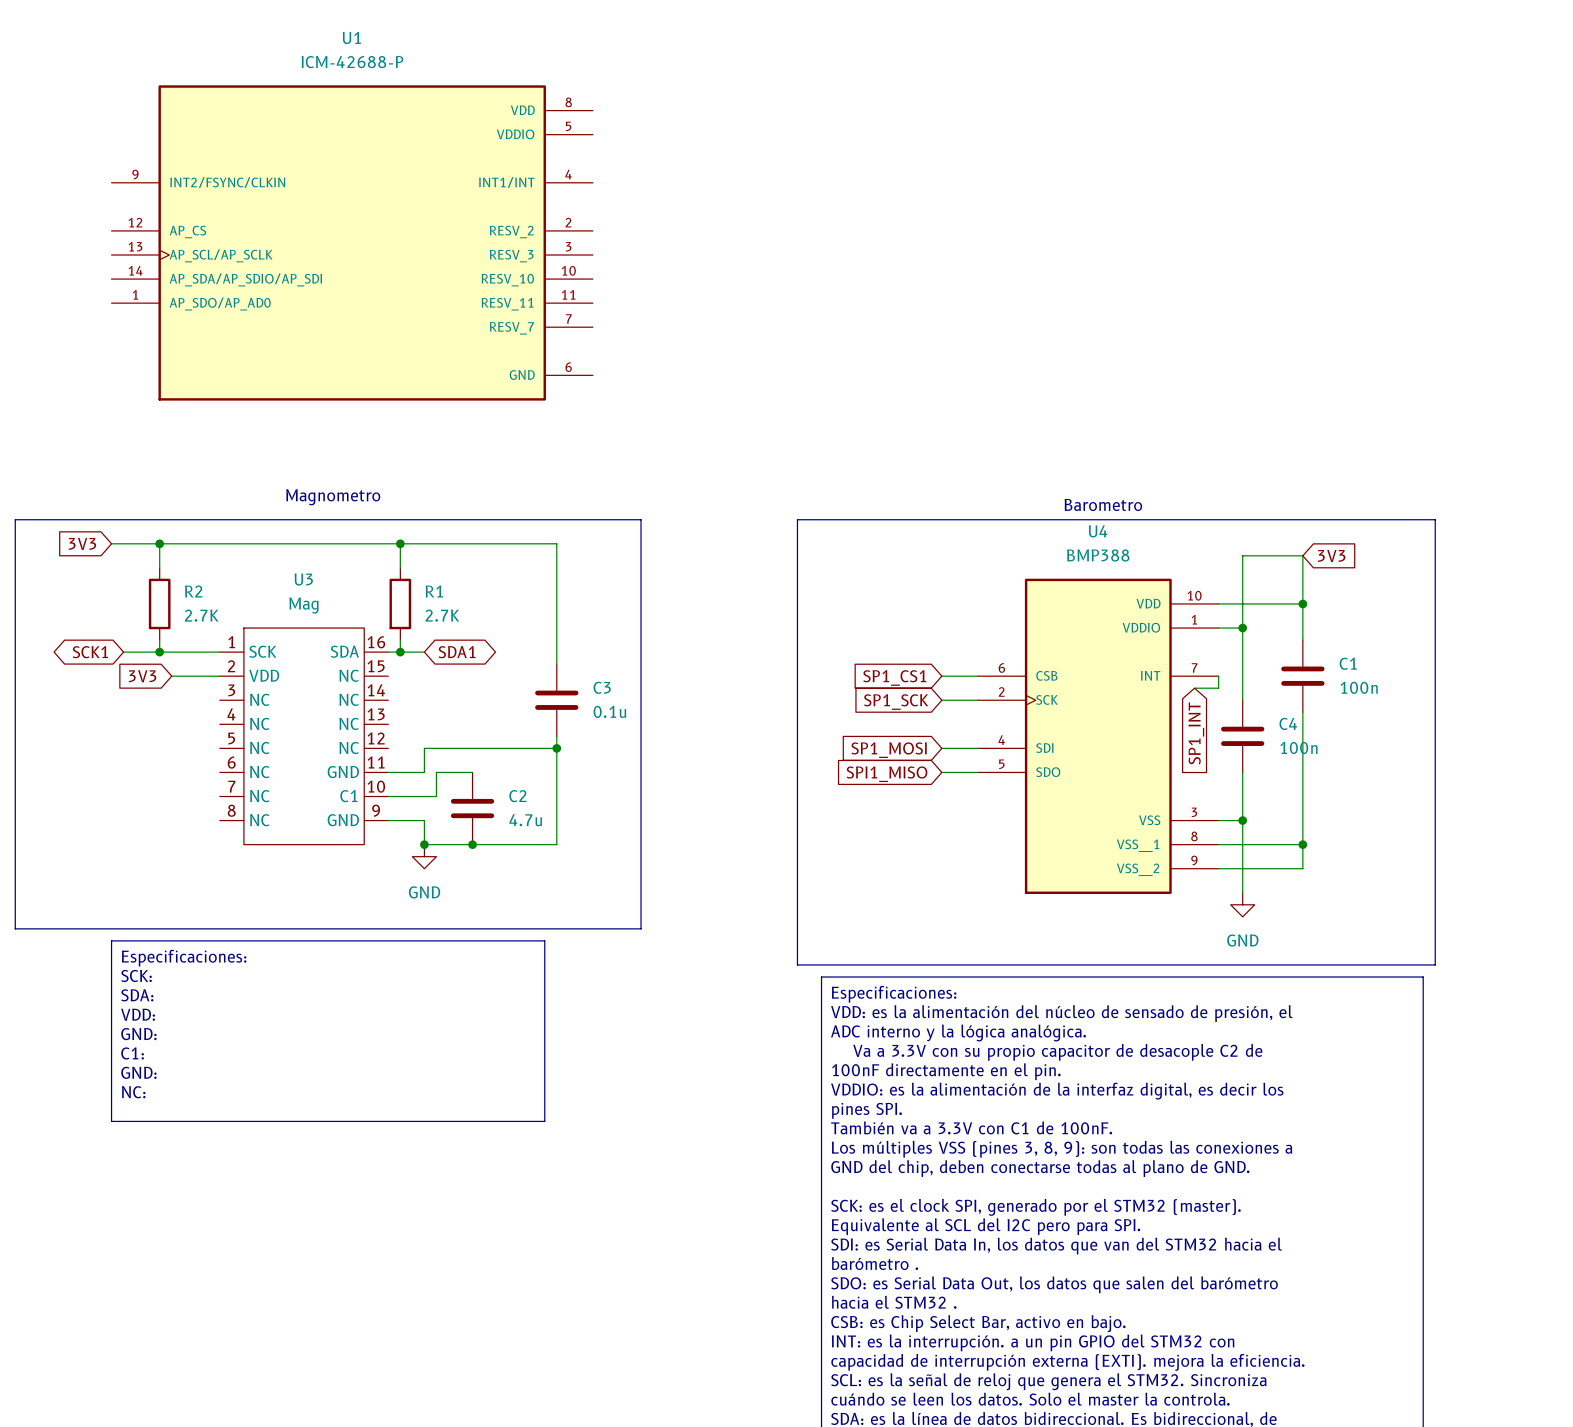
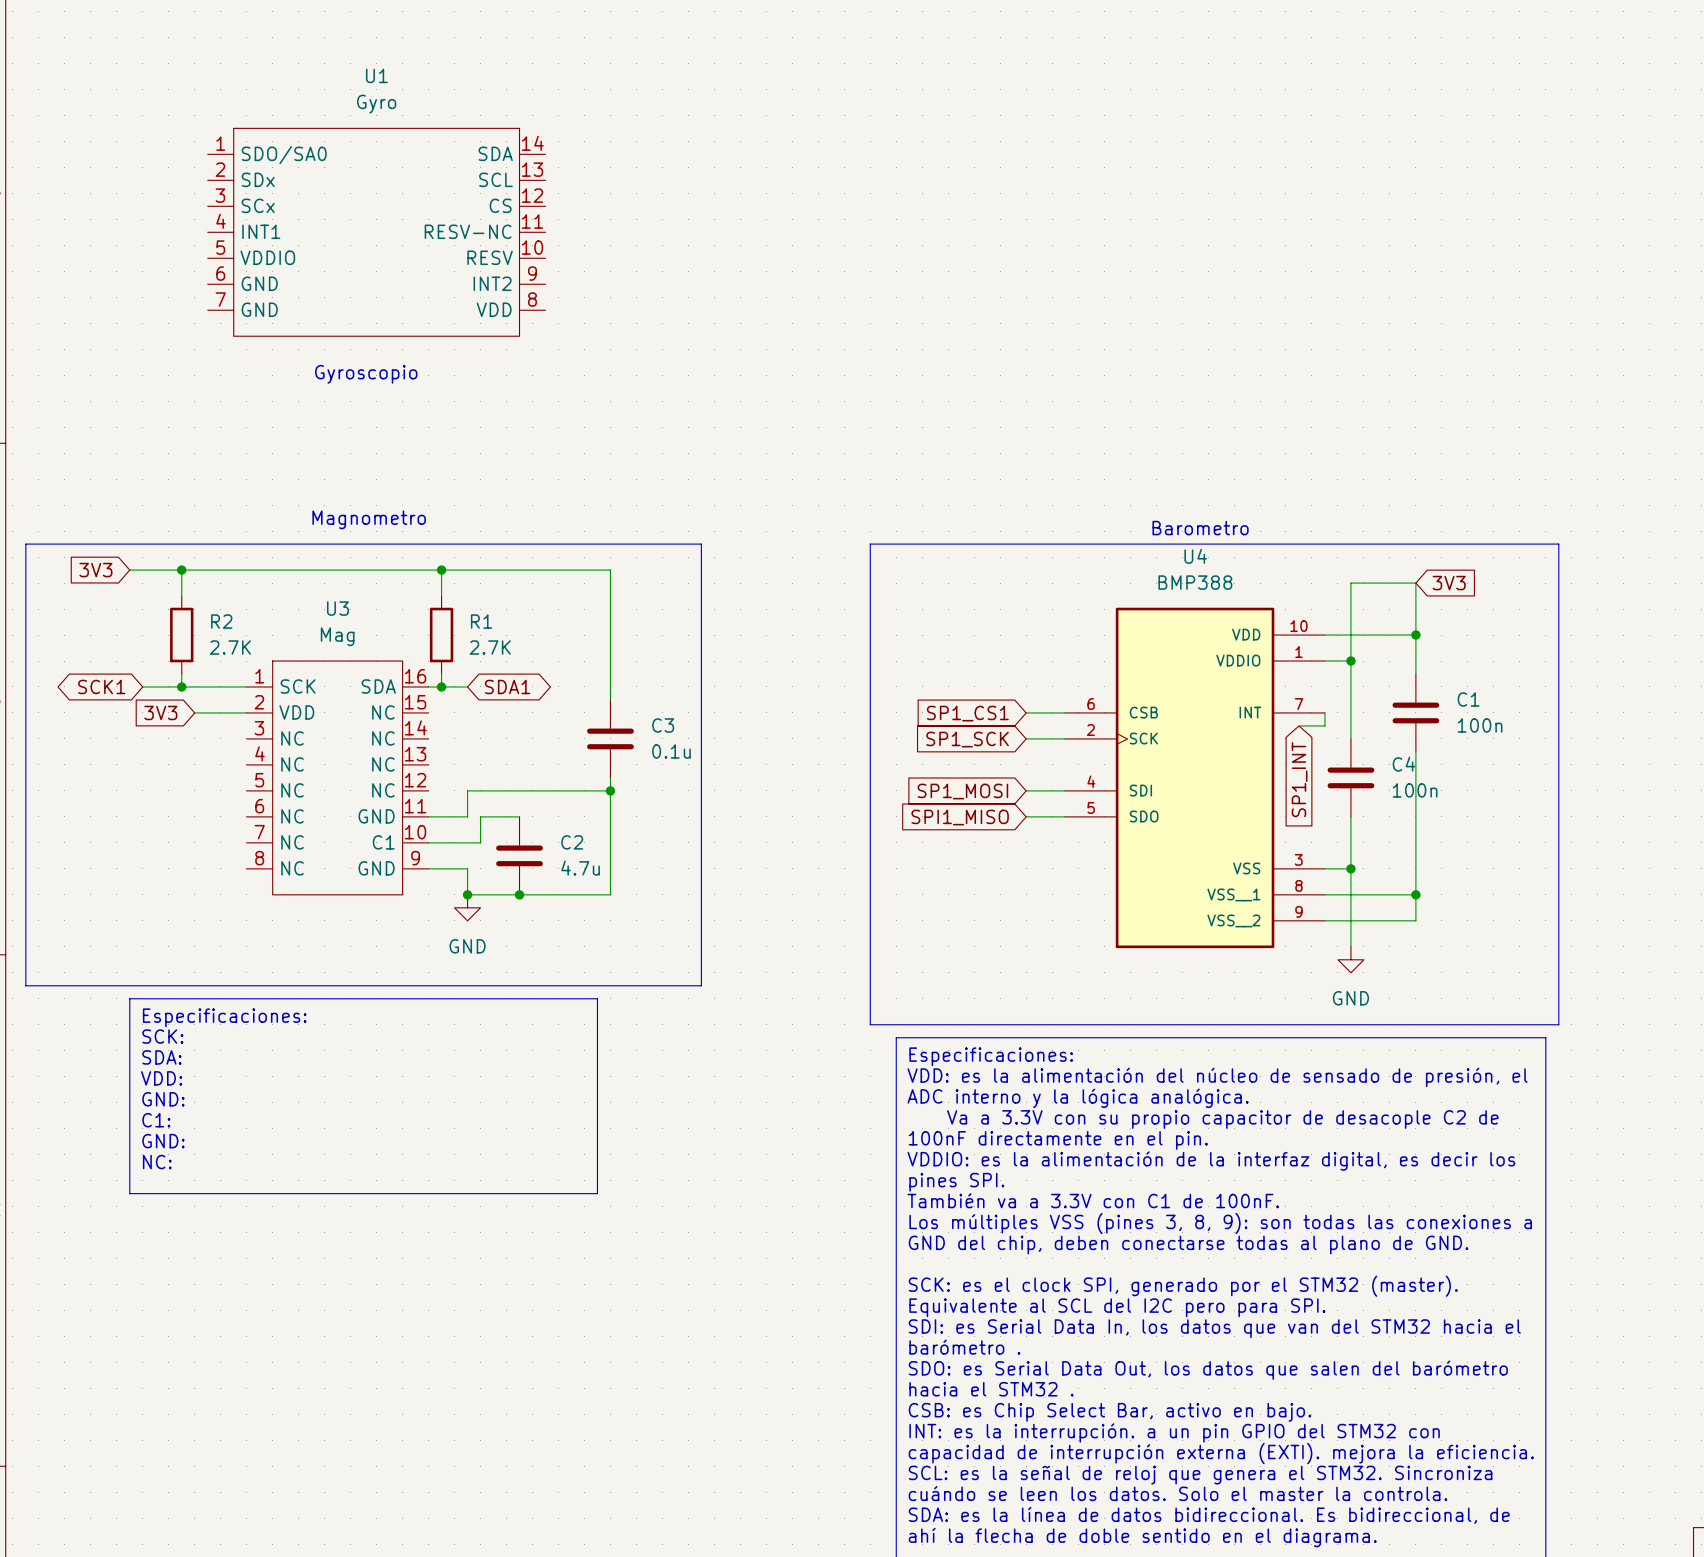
U1 name position: U1 (351, 38) -> U1 (376, 75)
U1 value: ICM-42688-P (352, 62) -> Gyro (376, 104)
U1 symbol: [111, 85, 593, 401] -> [207, 128, 546, 337]
text: none -> Gyroscopio (366, 374)

